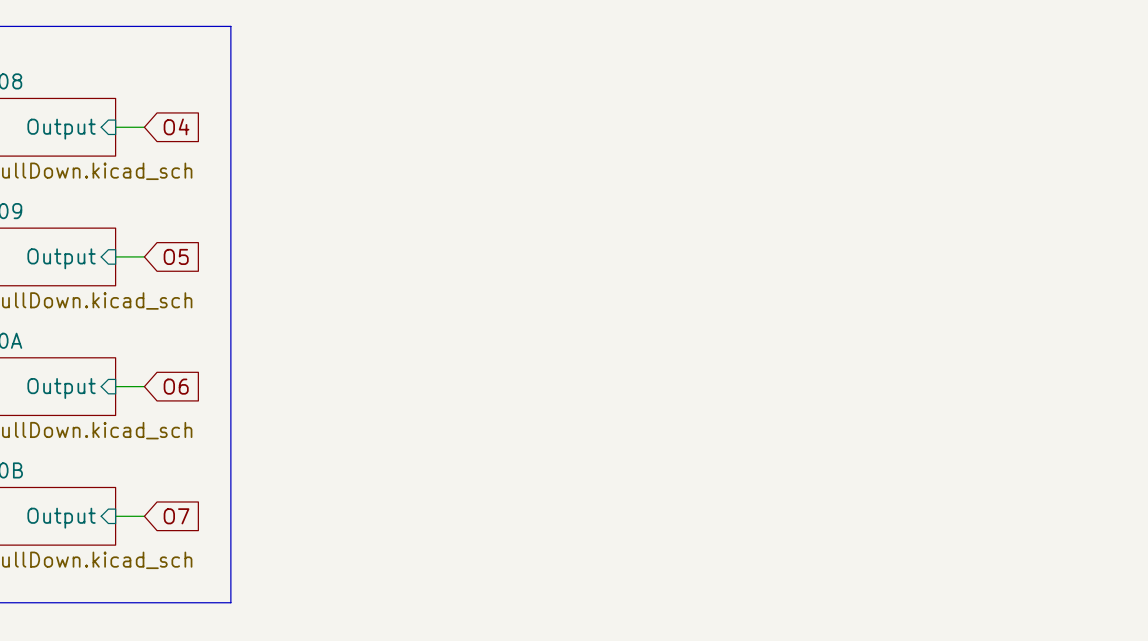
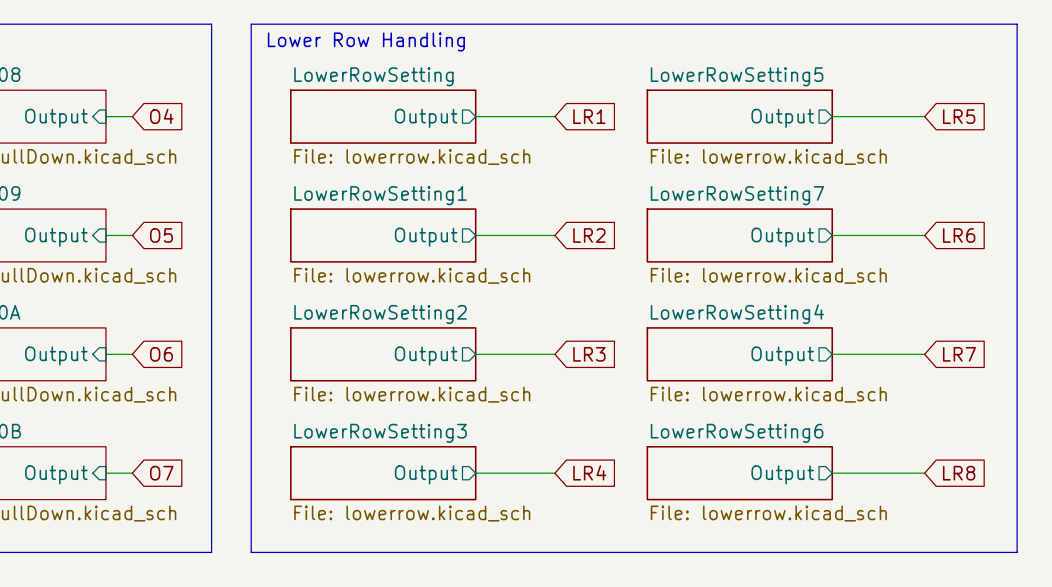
line: none -> (251, 24) (1017, 24) (1017, 552) (251, 552) (251, 24)
text: none -> Lower Row Handling (366, 41)
sheet LowerRowSetting: none -> File: lowerrow.kicad_sch (383, 116)
wire: none -> (475, 116) (554, 116)
global label: none -> LR1 (589, 116)
sheet LowerRowSetting5: none -> File: lowerrow.kicad_sch (739, 116)
wire: none -> (832, 116) (924, 116)
global label: none -> LR5 (959, 116)
sheet pin: none -> Output (426, 118)
sheet pin: none -> Output (782, 118)
sheet LowerRowSetting1: none -> File: lowerrow.kicad_sch (383, 235)
wire: none -> (475, 235) (554, 235)
global label: none -> LR2 (589, 235)
sheet LowerRowSetting7: none -> File: lowerrow.kicad_sch (739, 235)
wire: none -> (832, 235) (924, 235)
global label: none -> LR6 (959, 235)
sheet pin: none -> Output (426, 237)
sheet pin: none -> Output (782, 237)
sheet LowerRowSetting2: none -> File: lowerrow.kicad_sch (383, 354)
wire: none -> (475, 354) (554, 354)
global label: none -> LR3 (589, 354)
sheet LowerRowSetting4: none -> File: lowerrow.kicad_sch (739, 354)
wire: none -> (832, 354) (924, 354)
global label: none -> LR7 (959, 354)
sheet pin: none -> Output (426, 356)
sheet pin: none -> Output (782, 356)
global label: none -> LR4 (589, 472)
sheet LowerRowSetting3: none -> File: lowerrow.kicad_sch (383, 473)
wire: none -> (475, 473) (554, 473)
sheet LowerRowSetting6: none -> File: lowerrow.kicad_sch (739, 473)
wire: none -> (832, 473) (924, 473)
global label: none -> LR8 (959, 473)
sheet pin: none -> Output (426, 474)
sheet pin: none -> Output (782, 474)

